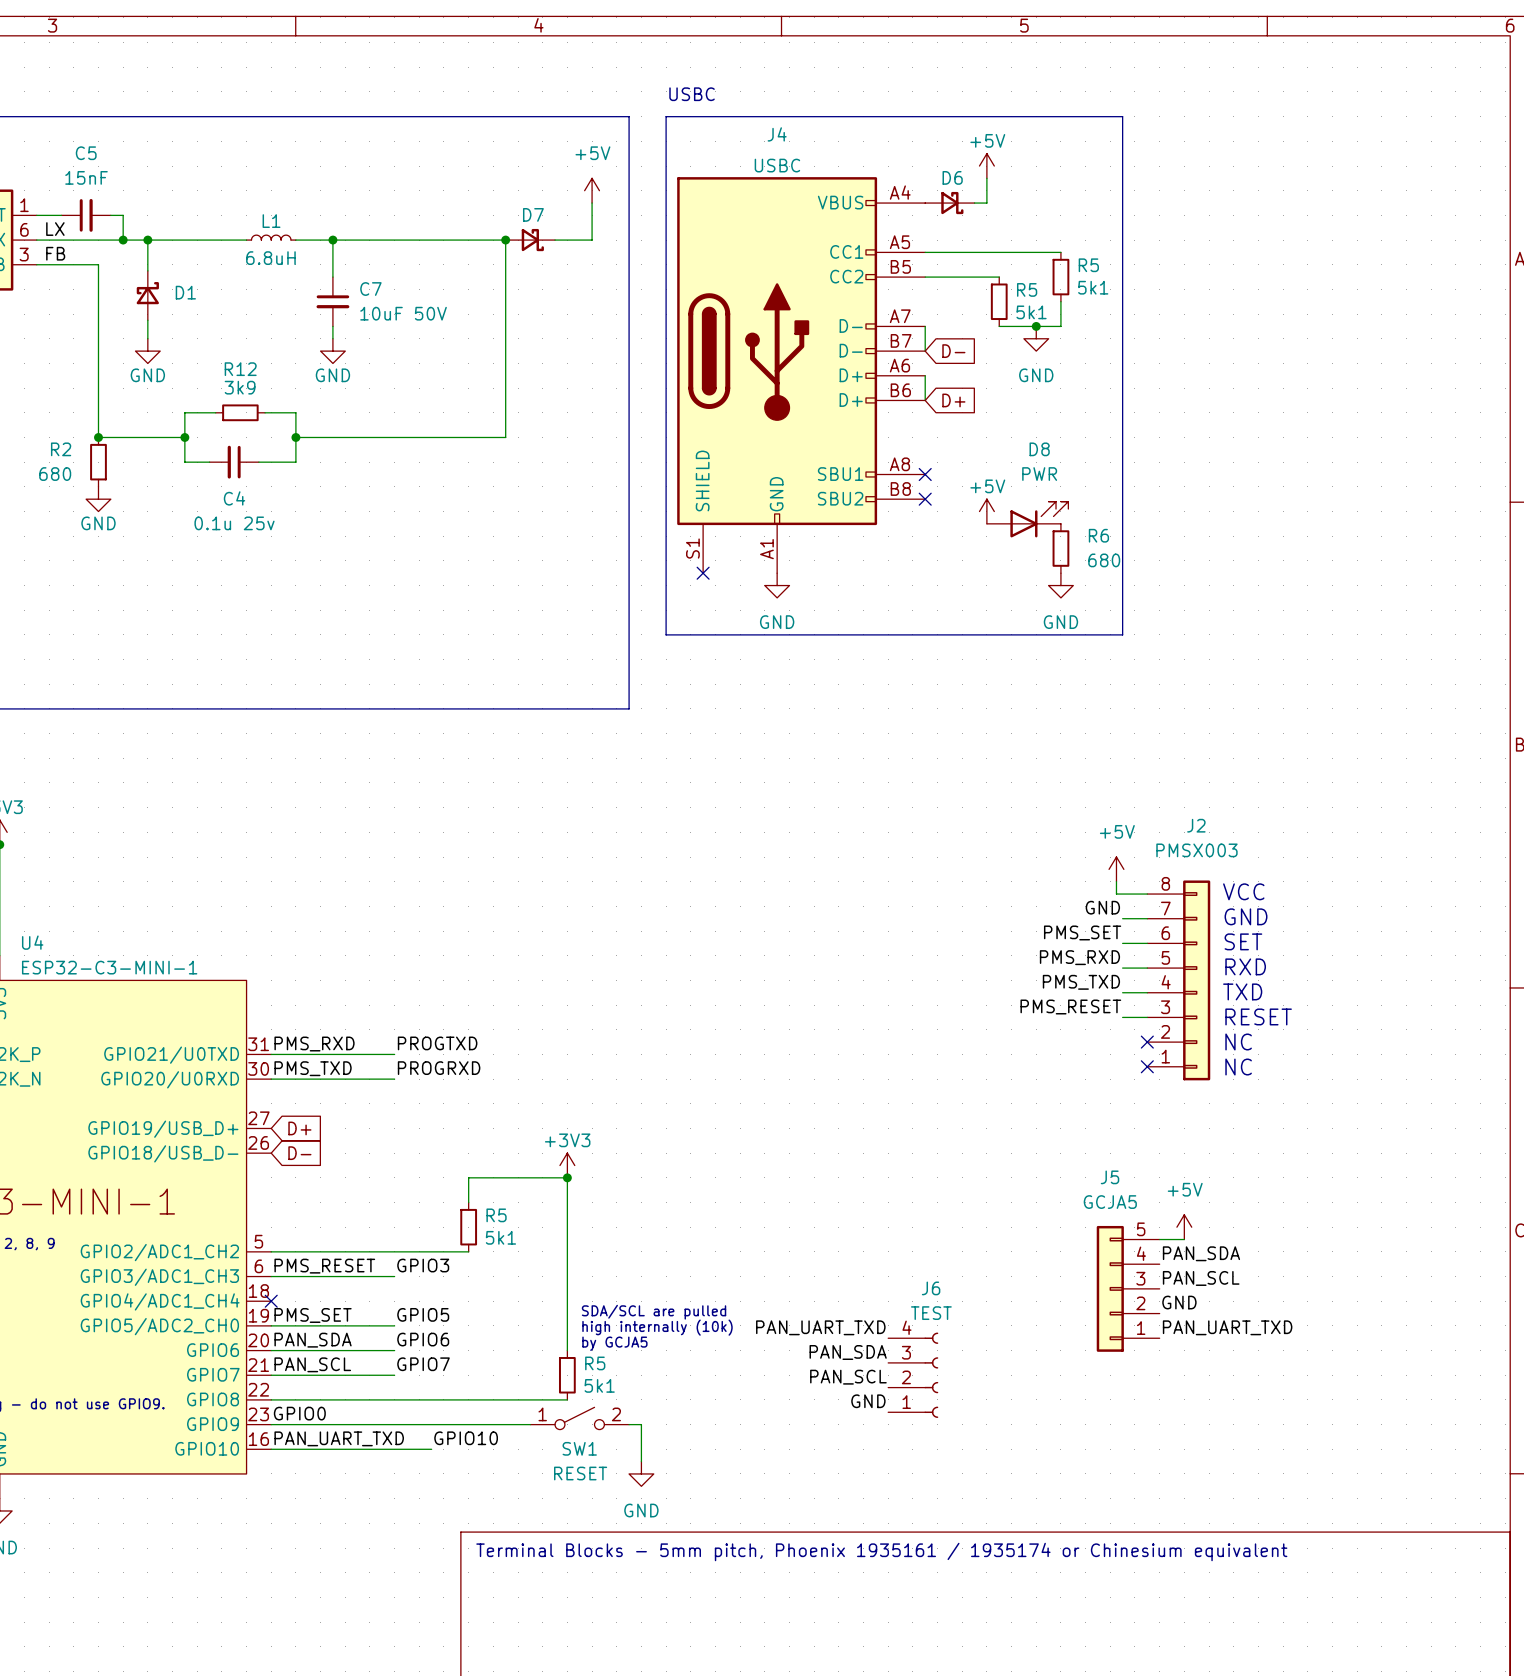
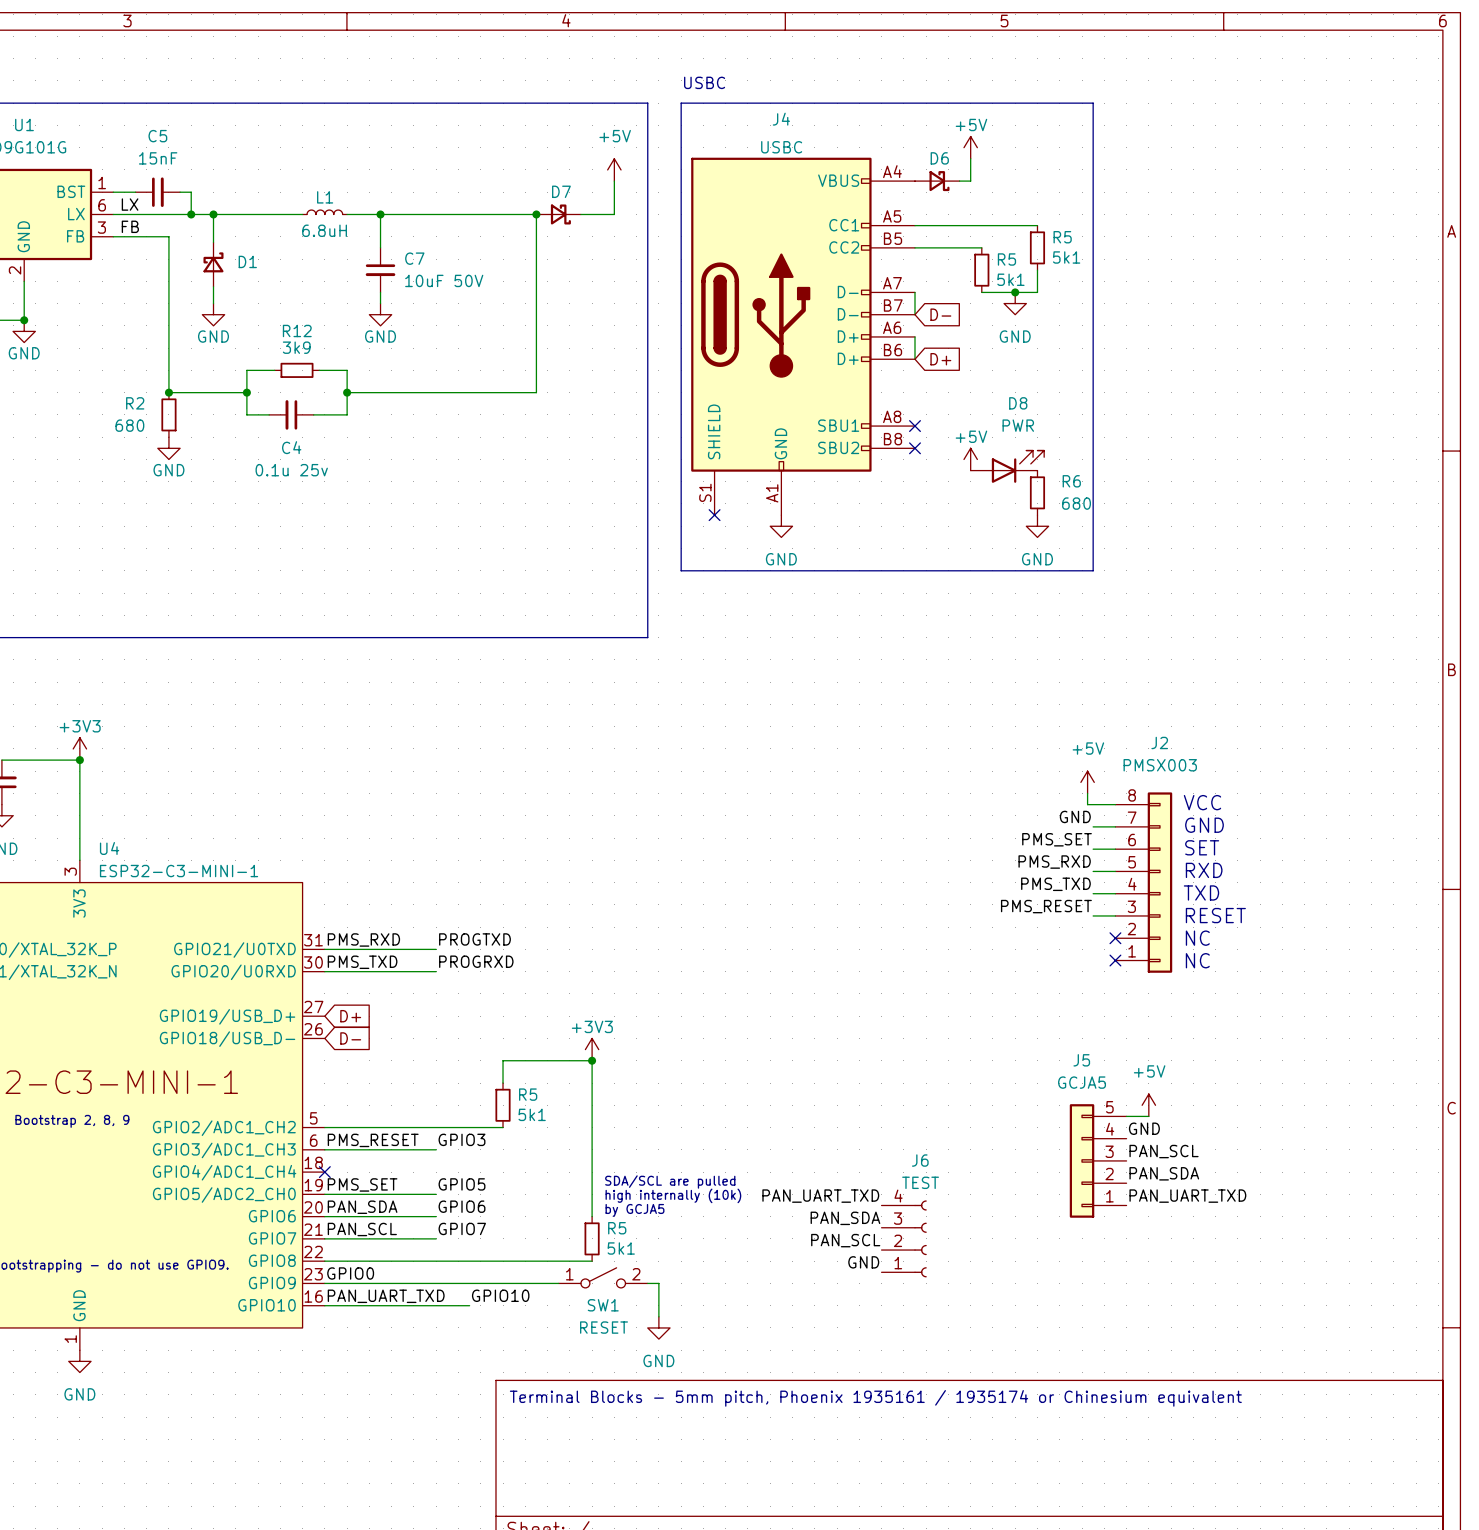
label: PAN_SDA (1201, 1253) -> GND (1144, 1128)
label: GND (1179, 1302) -> PAN_SDA (1164, 1173)

